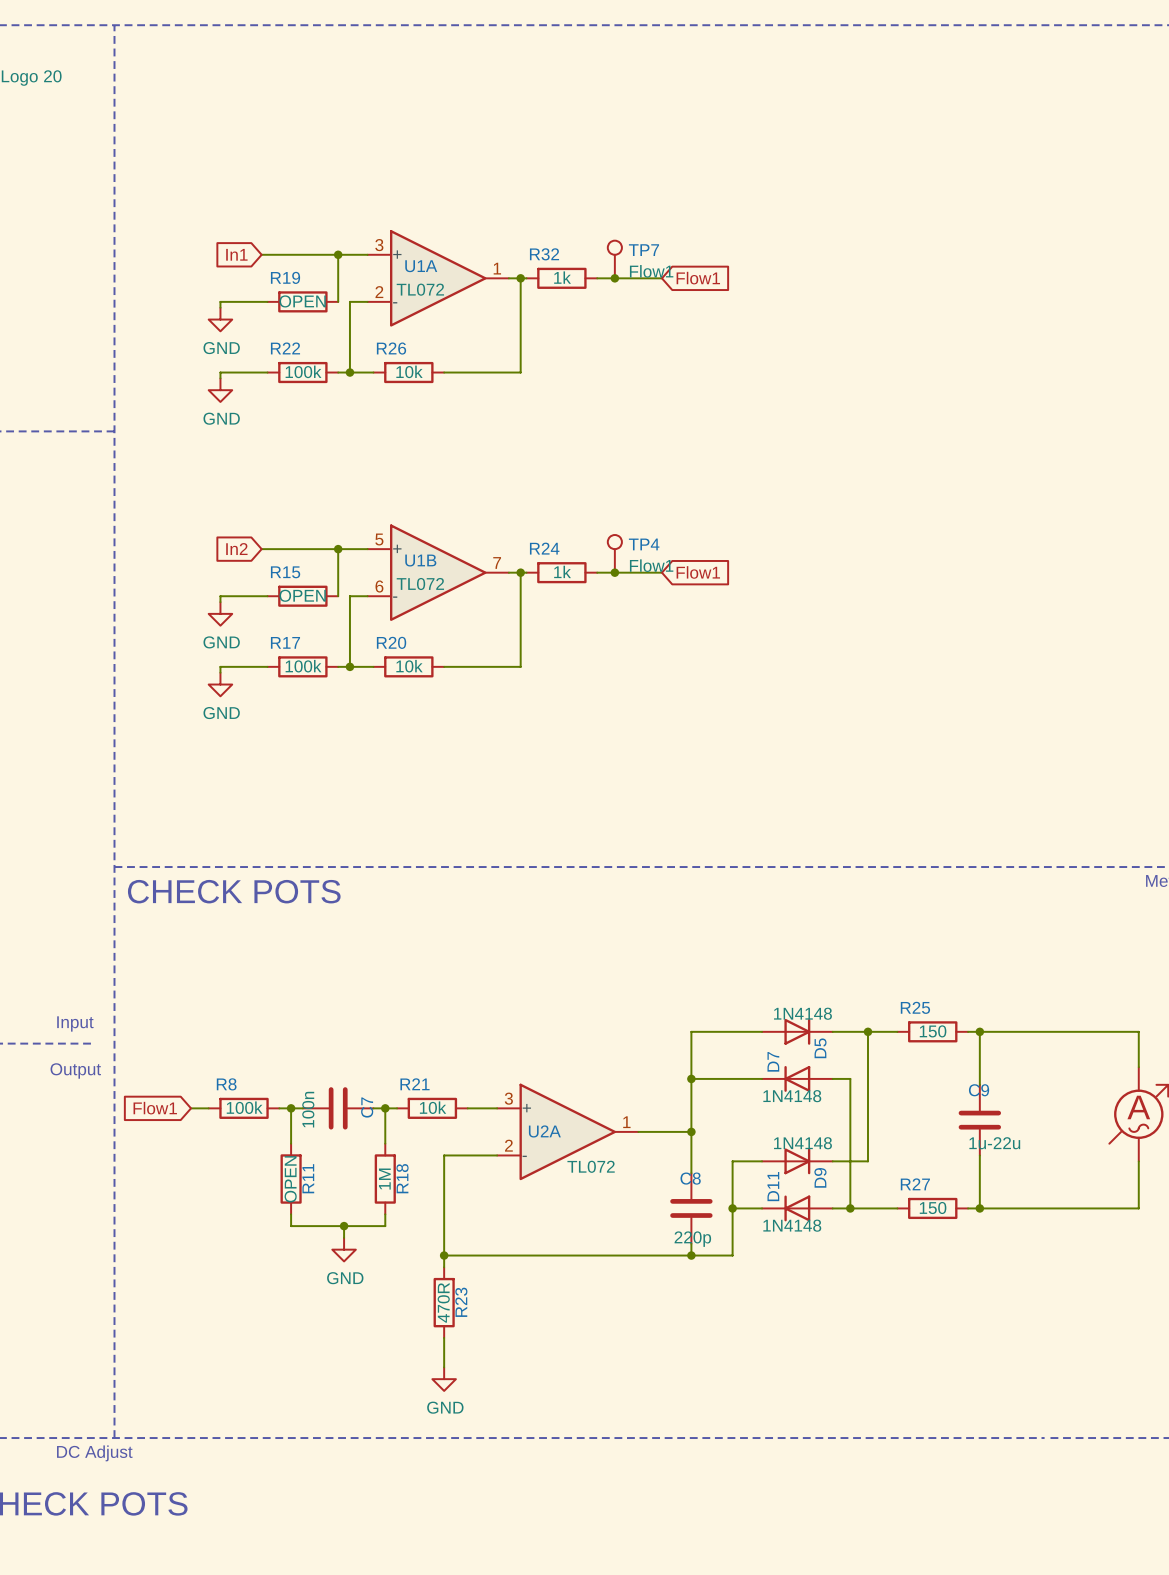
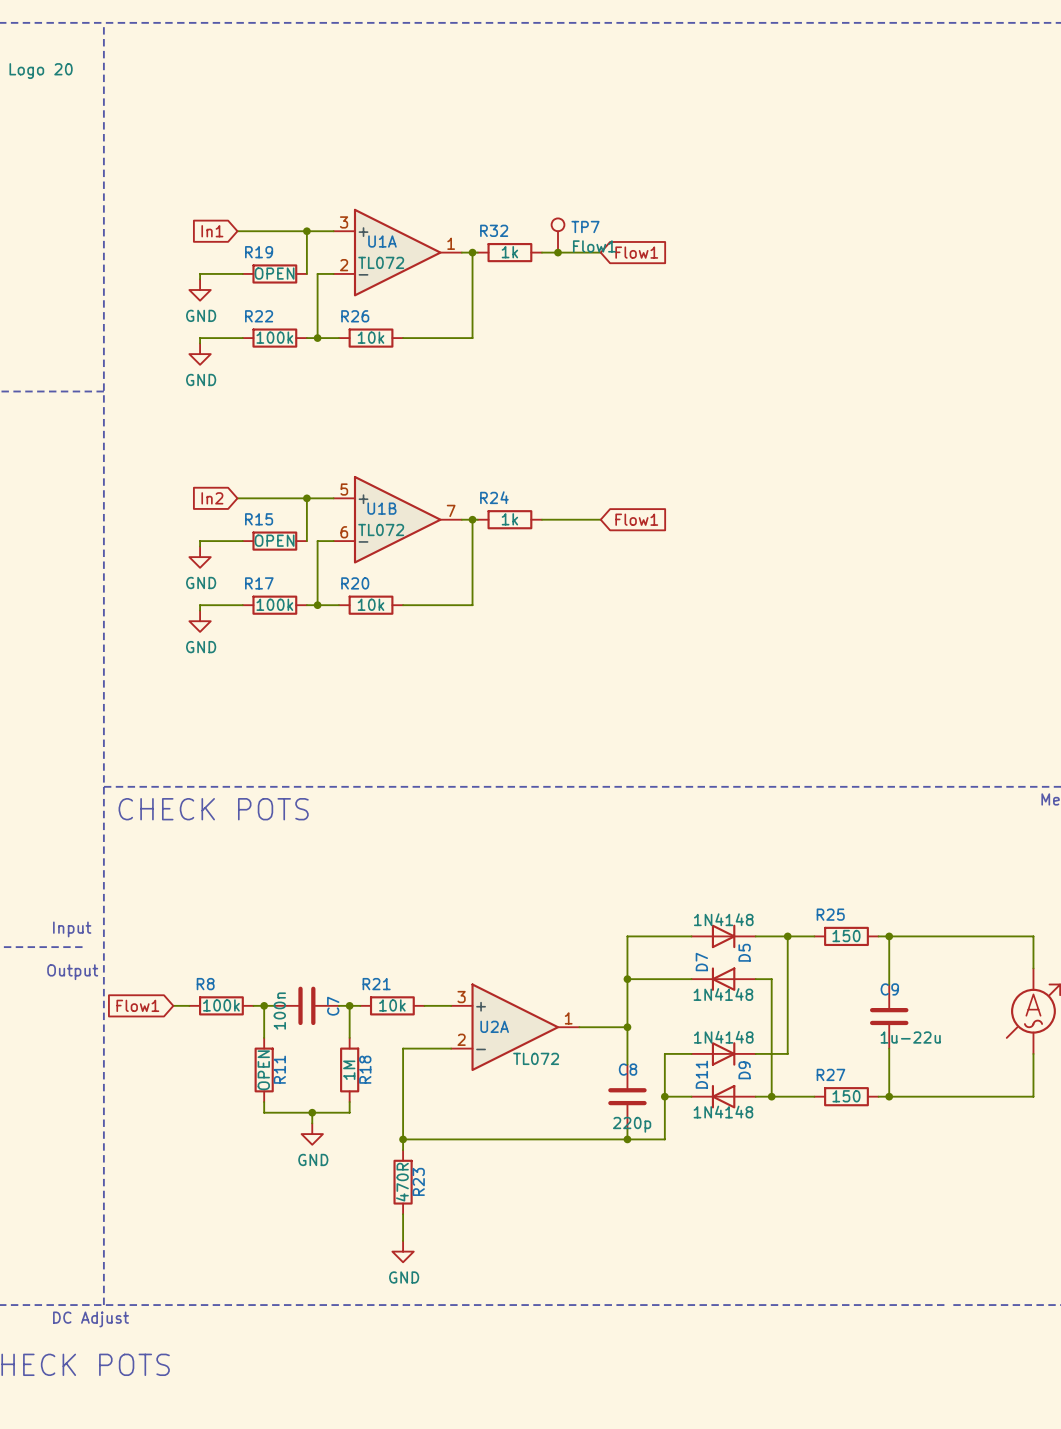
TP4: Flow1 (614, 553) -> none
junction: (614, 572) -> none

